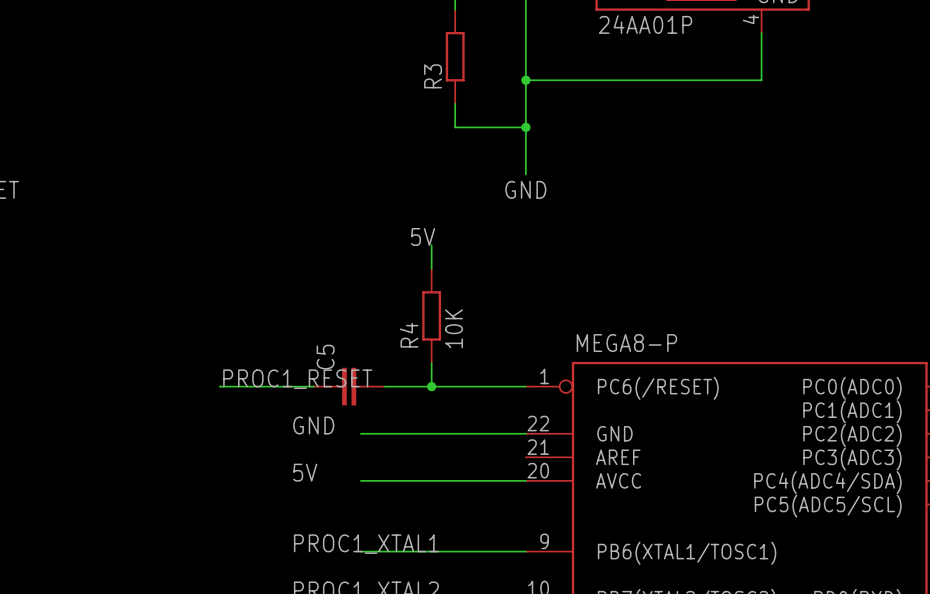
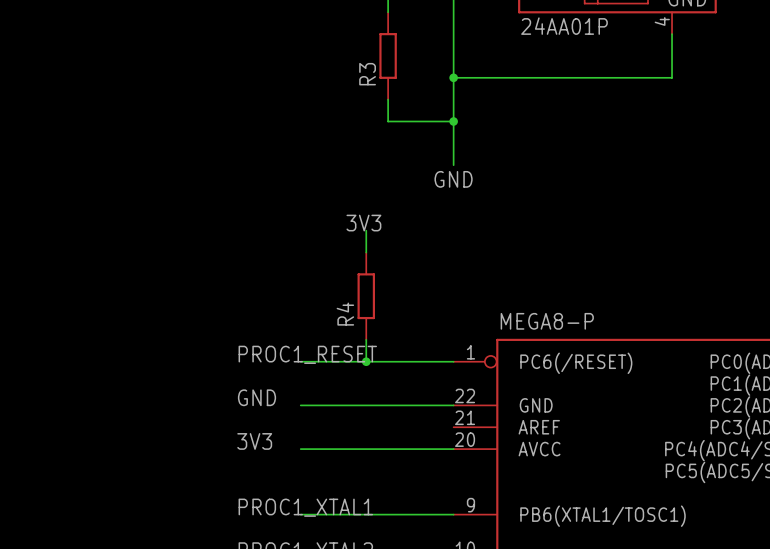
label: 5V (423, 236) -> 3V3 (363, 223)
R4 value: 10K (454, 328) -> none
label position: PROC1_RESET (297, 379) -> PROC1_RESET (307, 354)
wire: (219, 386) (313, 386) -> none
C5: (349, 386) -> none
label: 5V (305, 472) -> 3V3 (254, 441)

